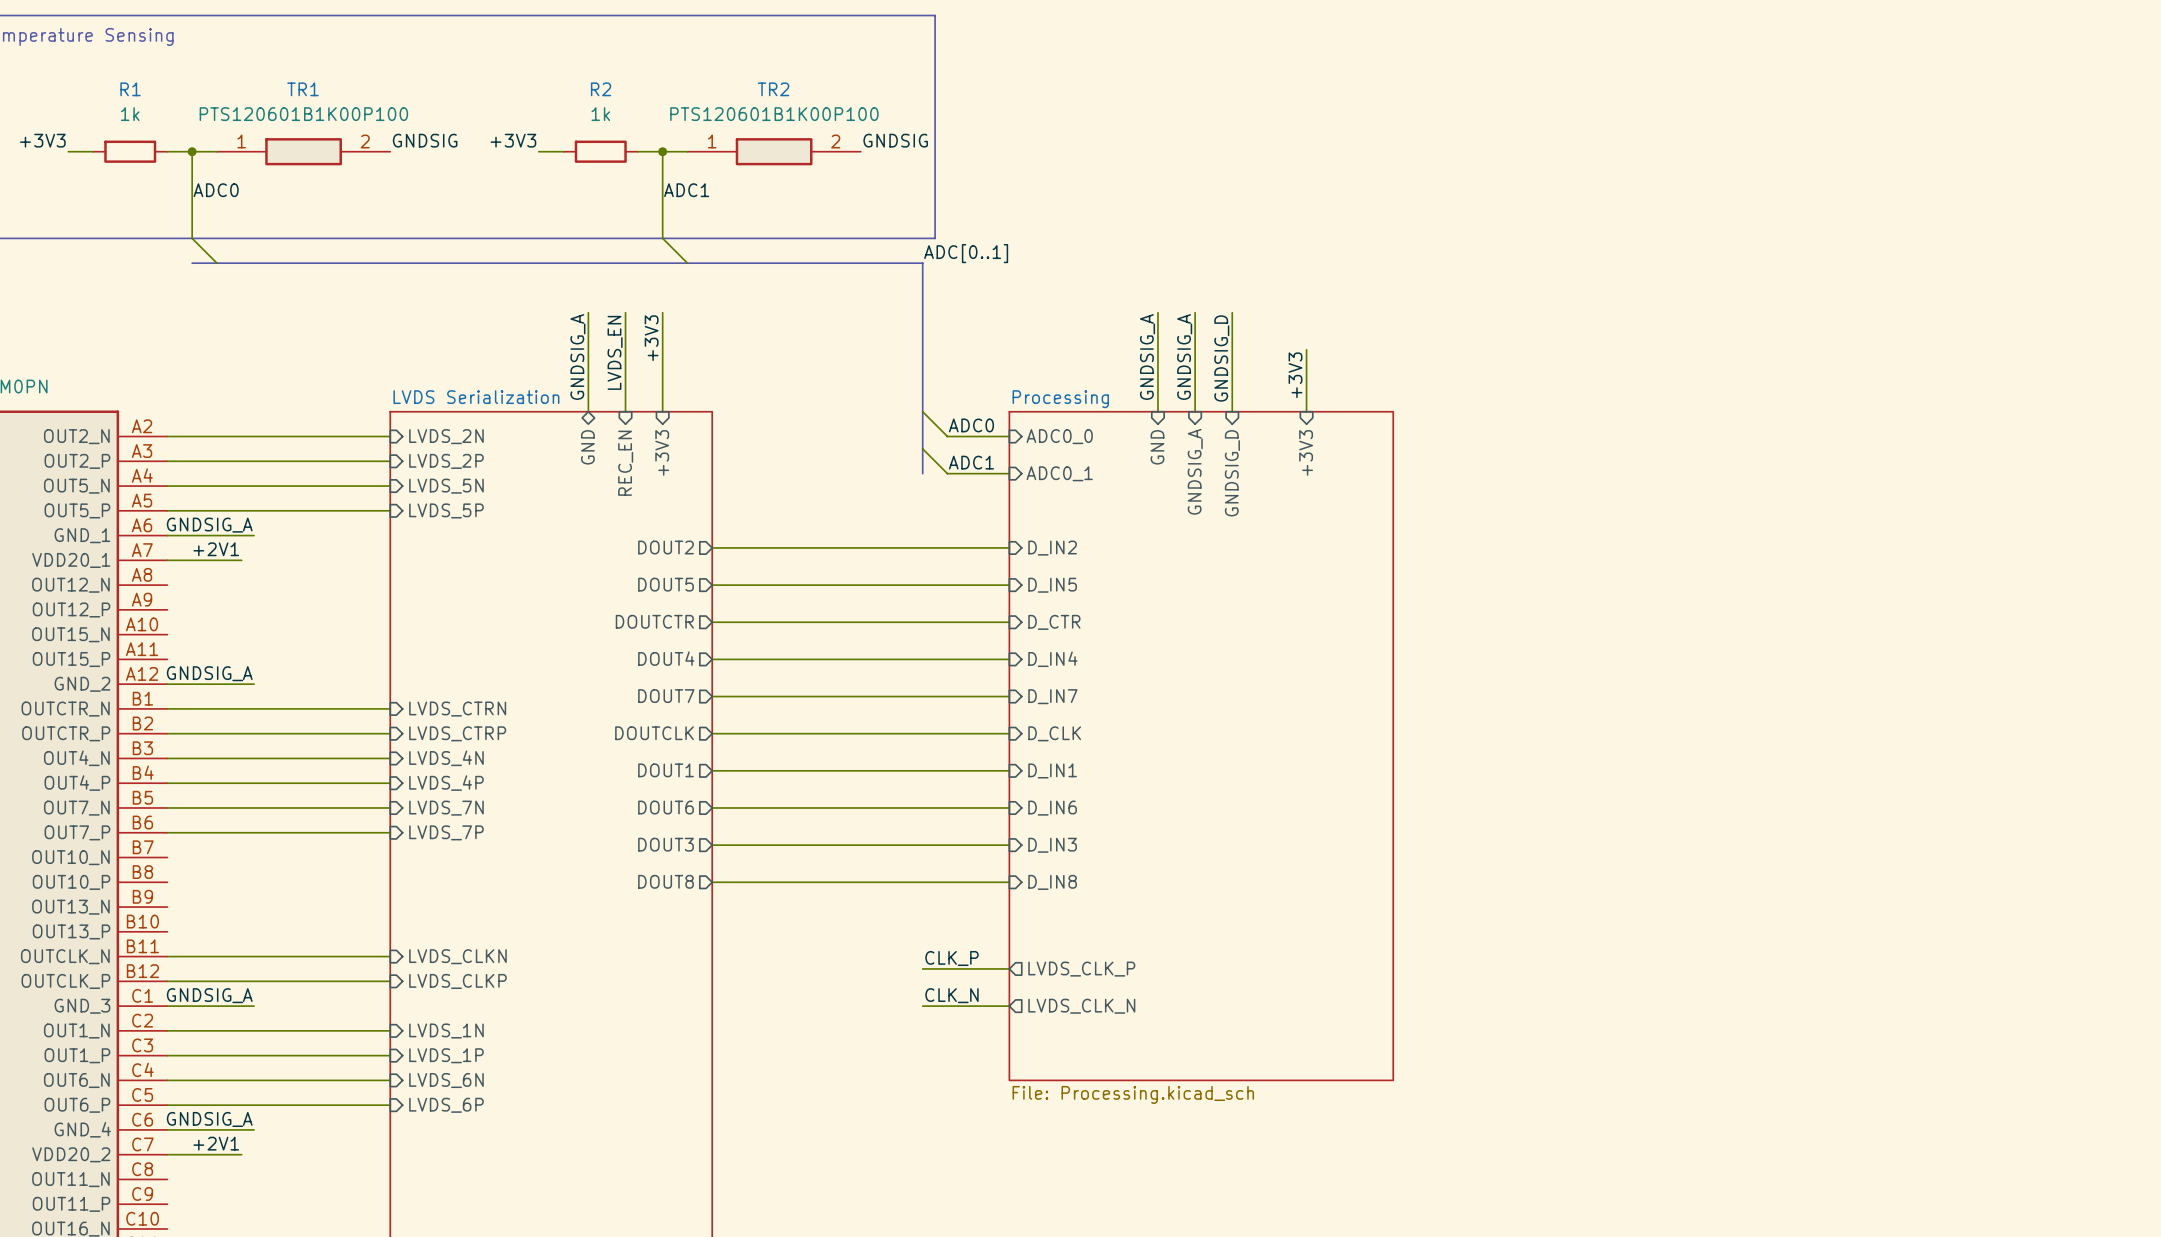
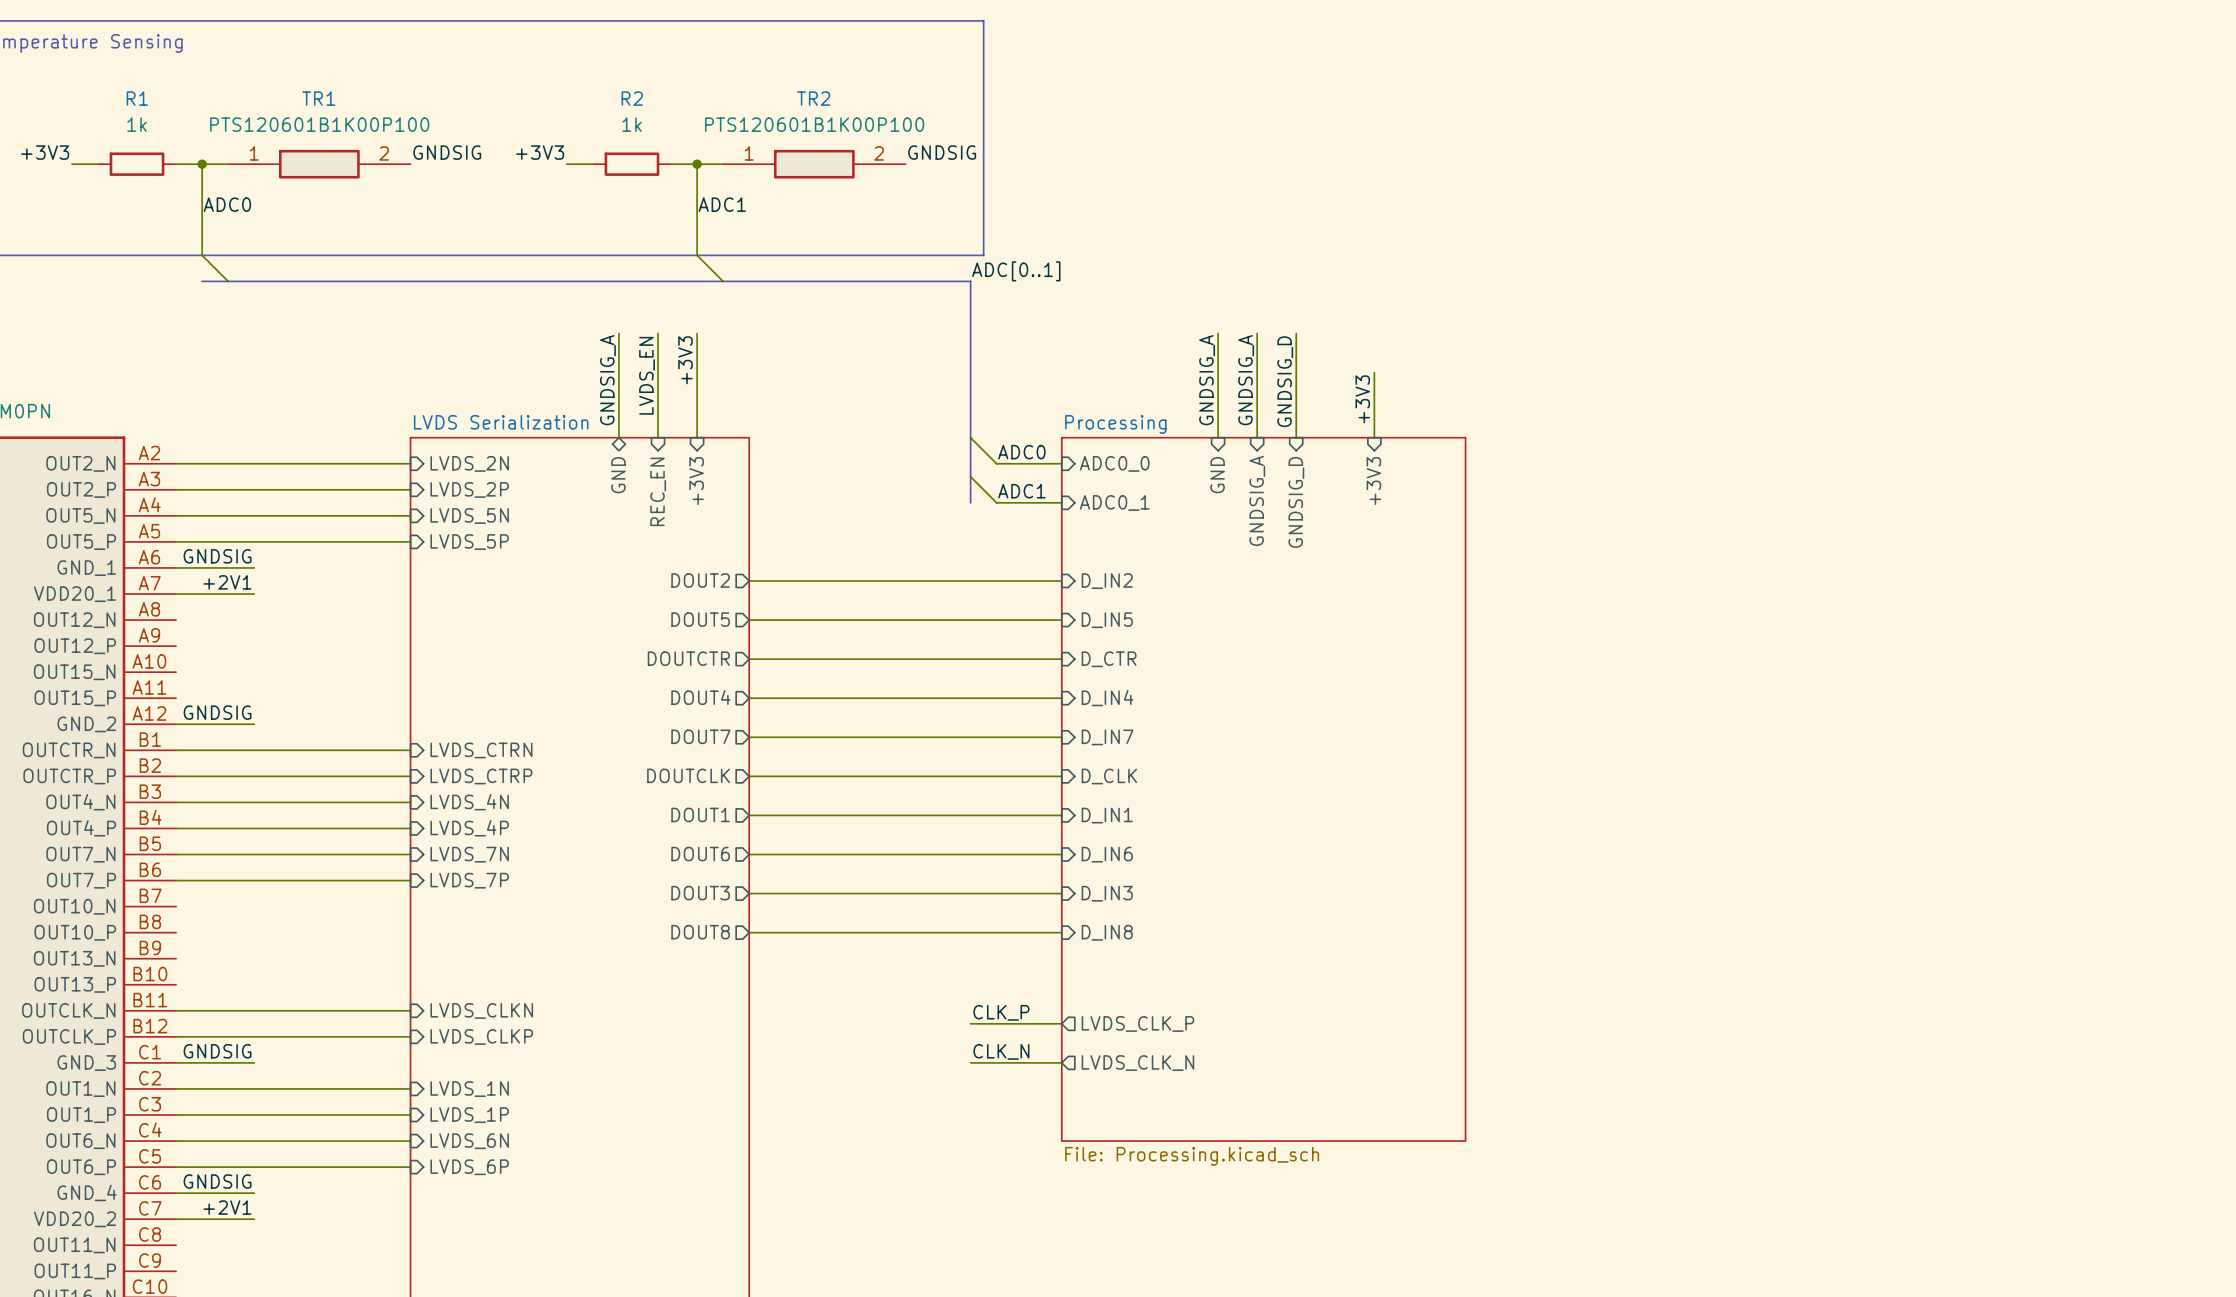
label: GNDSIG_A (209, 525) -> GNDSIG (217, 556)
wire: (241, 535) (254, 535) -> none
label: GNDSIG_A (209, 673) -> GNDSIG (217, 712)
wire: (241, 684) (254, 684) -> none
label: GNDSIG_A (209, 995) -> GNDSIG (217, 1051)
wire: (241, 1006) (254, 1006) -> none
label: GNDSIG_A (209, 1119) -> GNDSIG (217, 1181)
wire: (241, 1129) (254, 1129) -> none

